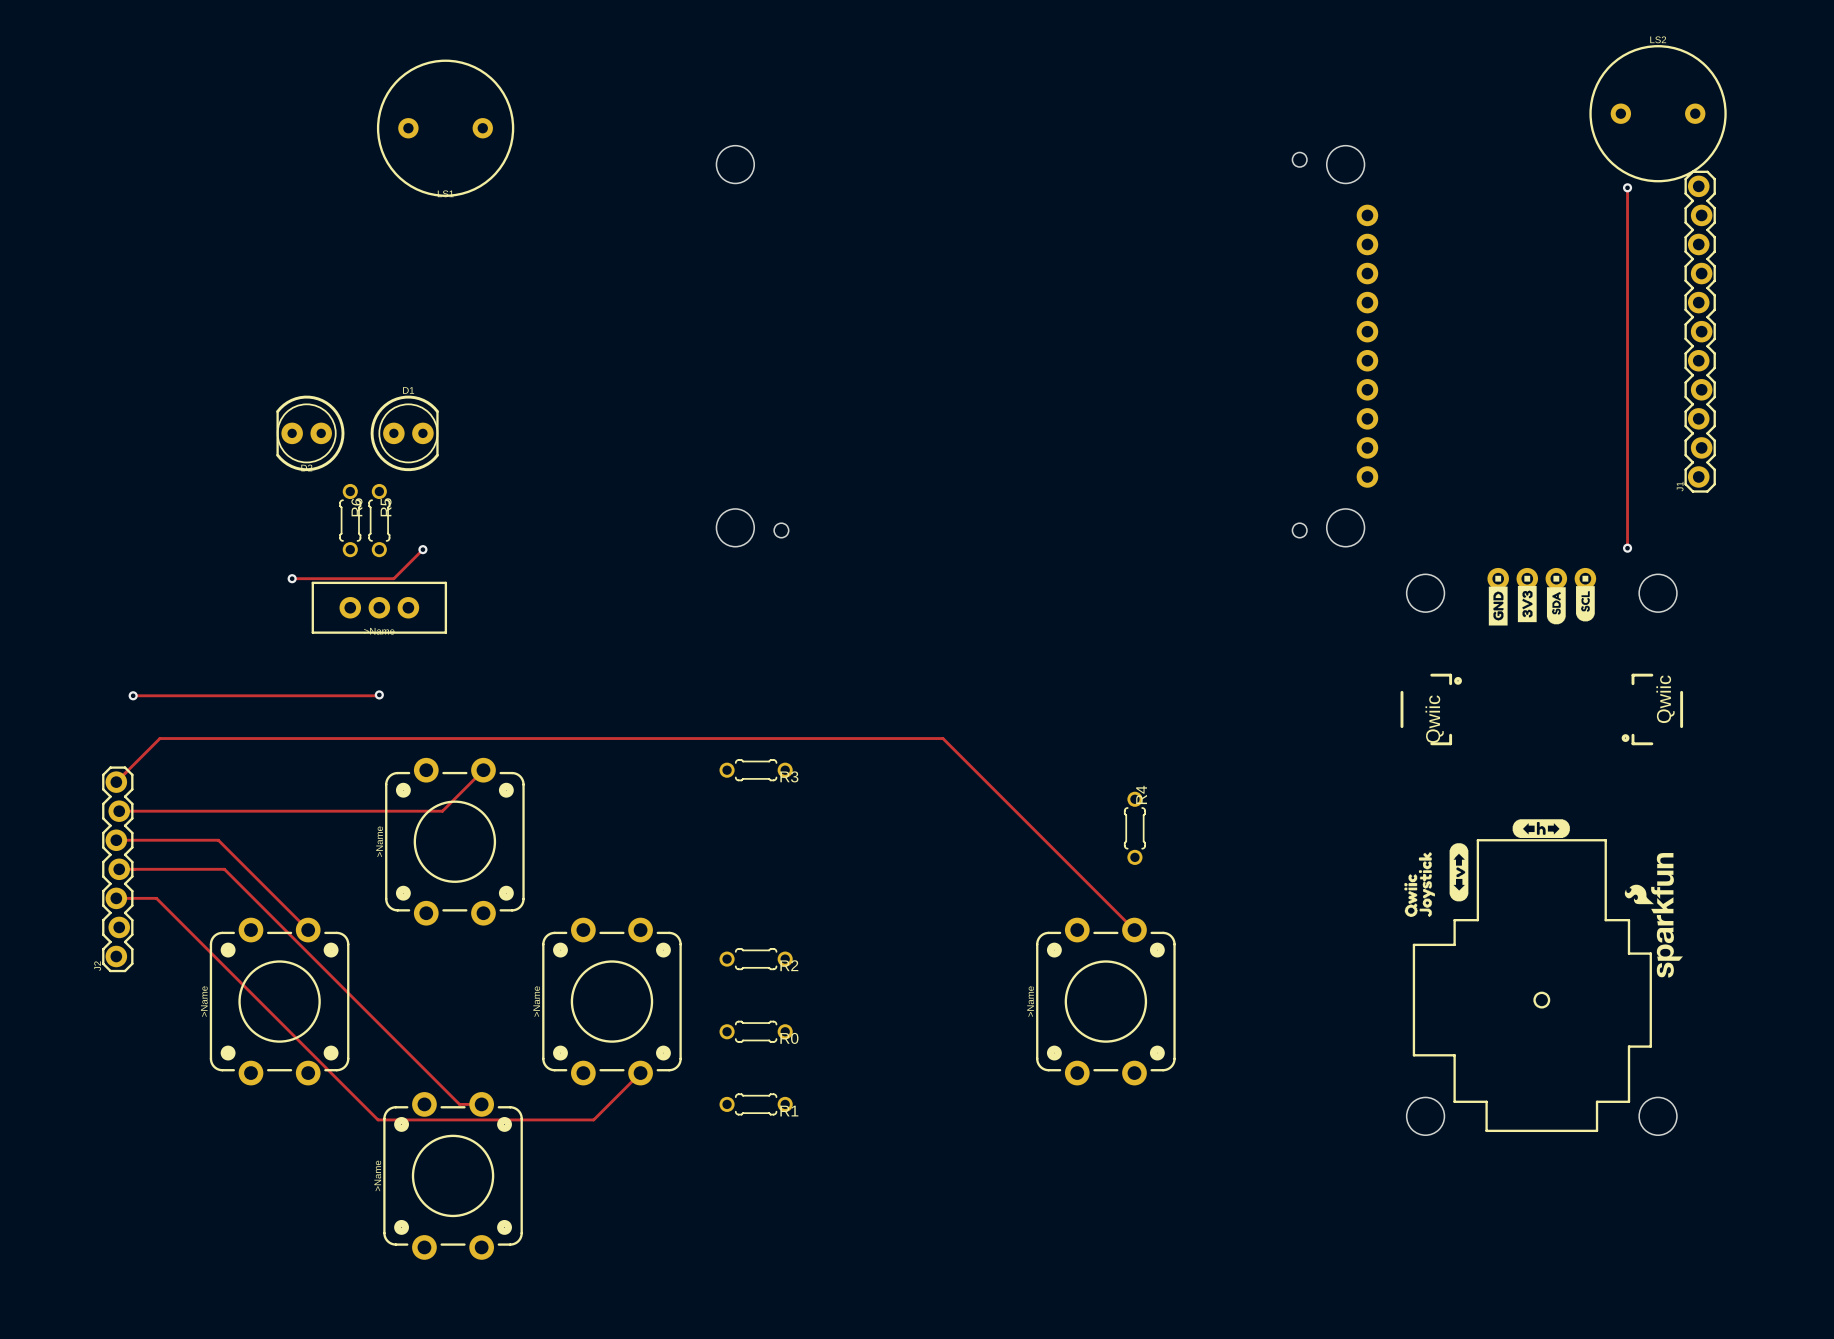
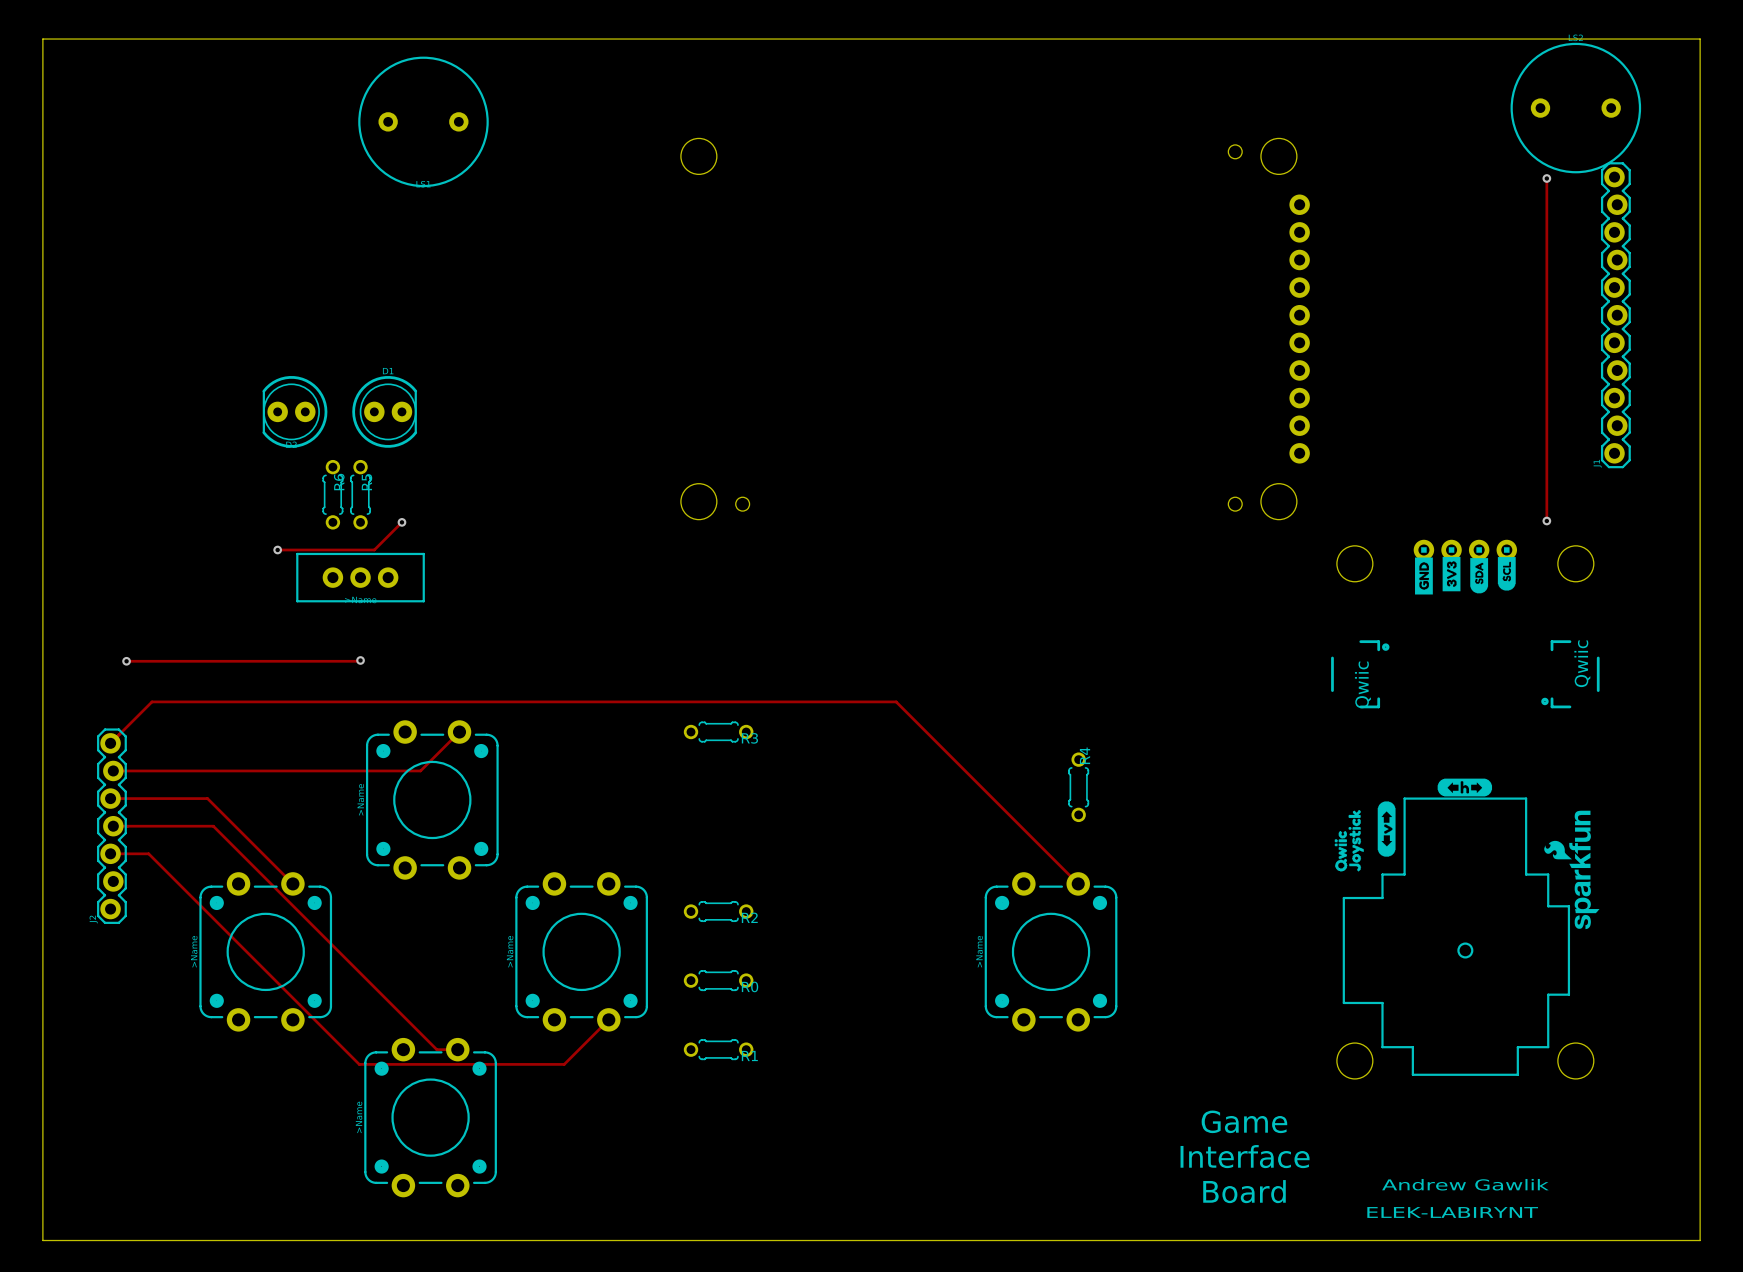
board edge: none -> (42, 39) (1700, 39) (1700, 1240) (42, 1240) (42, 39)
text: none -> Game (1244, 1121)
text: none -> Interface (1245, 1156)
text: none -> Andrew Gawlik (1465, 1184)
text: none -> Board (1244, 1191)
text: none -> ELEK-LABIRYNT (1452, 1212)

